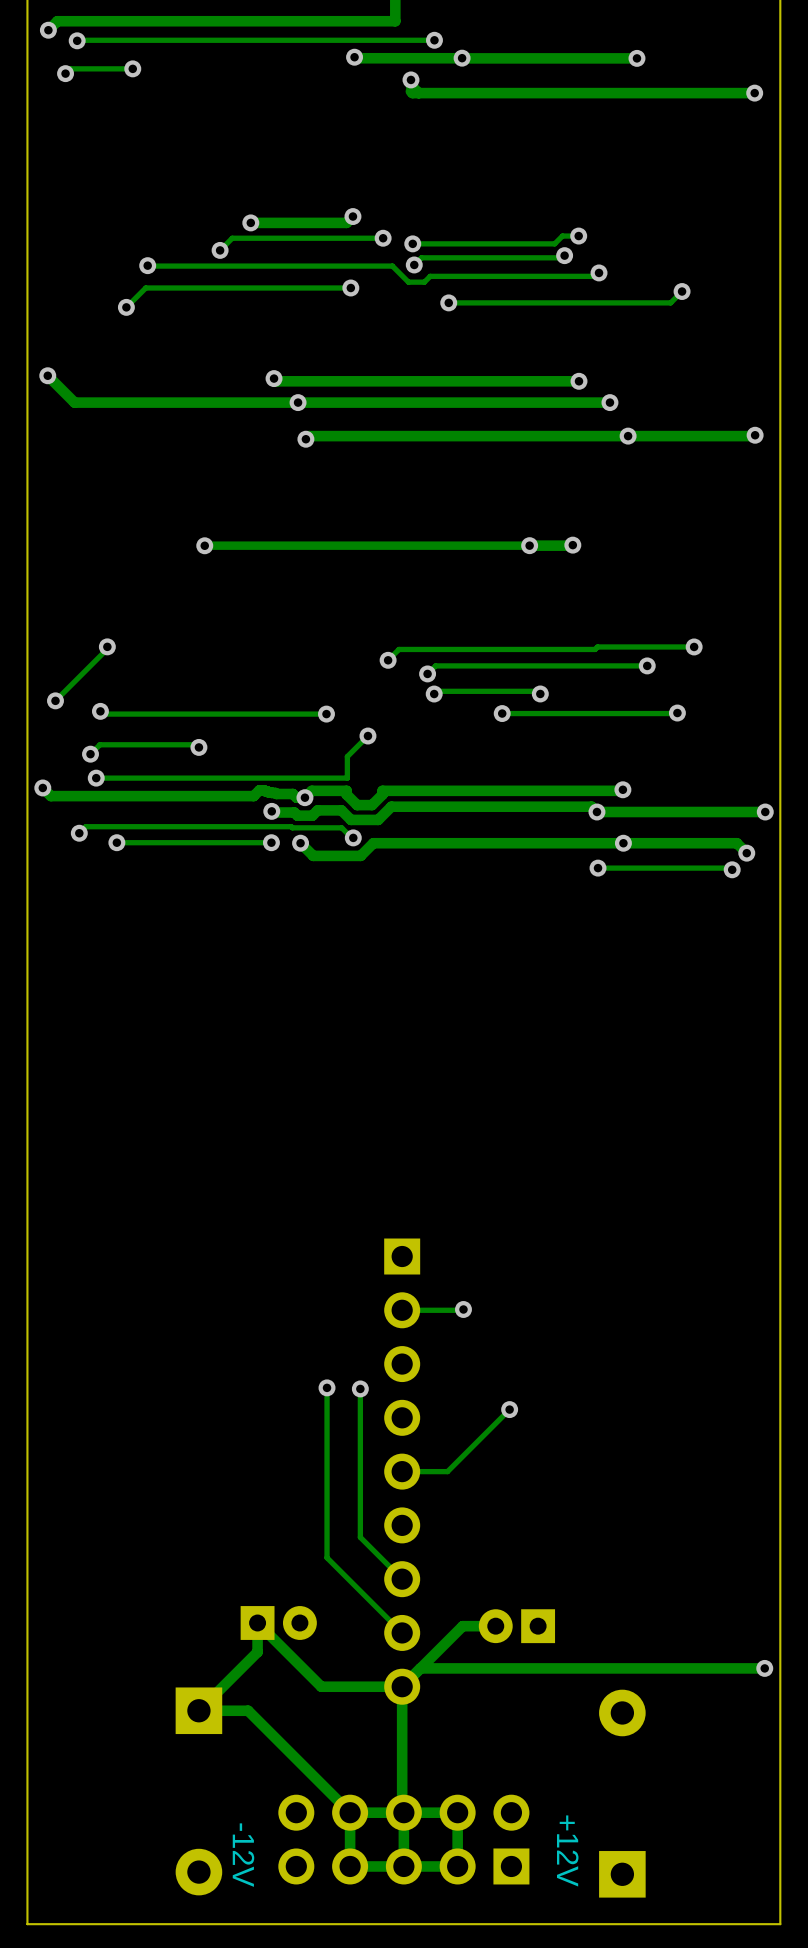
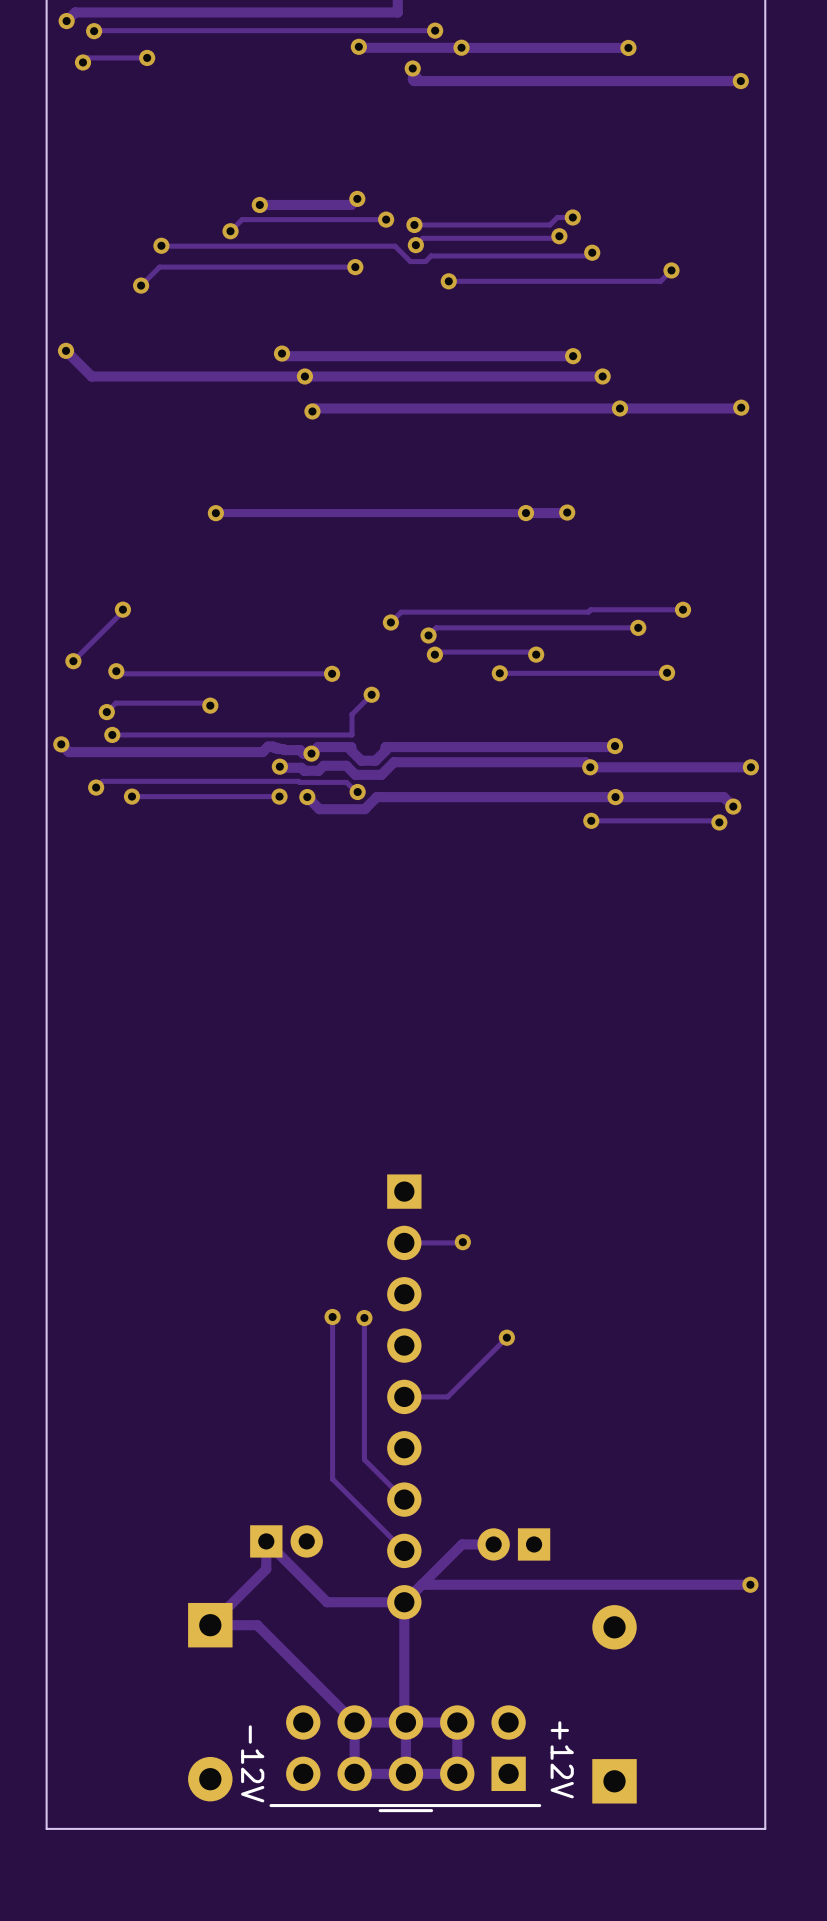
line: none -> (539, 1805) (270, 1805)
line: none -> (431, 1810) (380, 1810)

